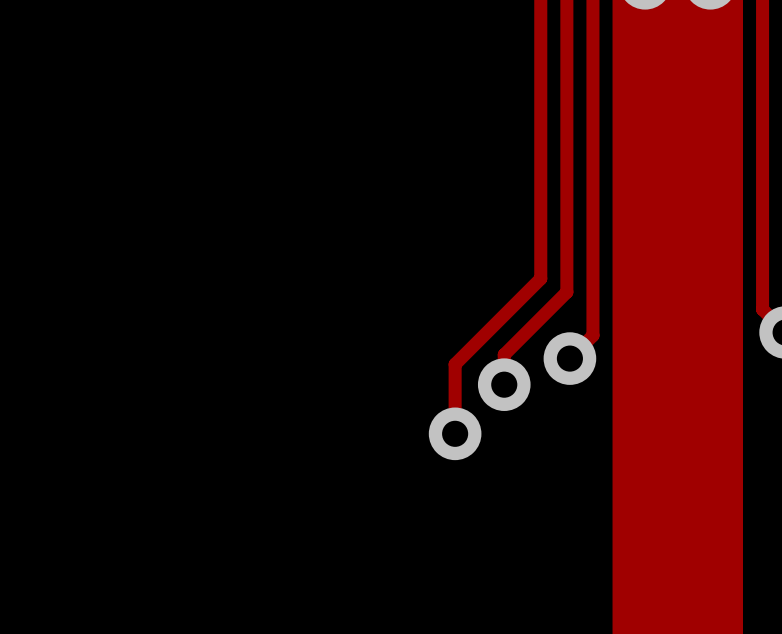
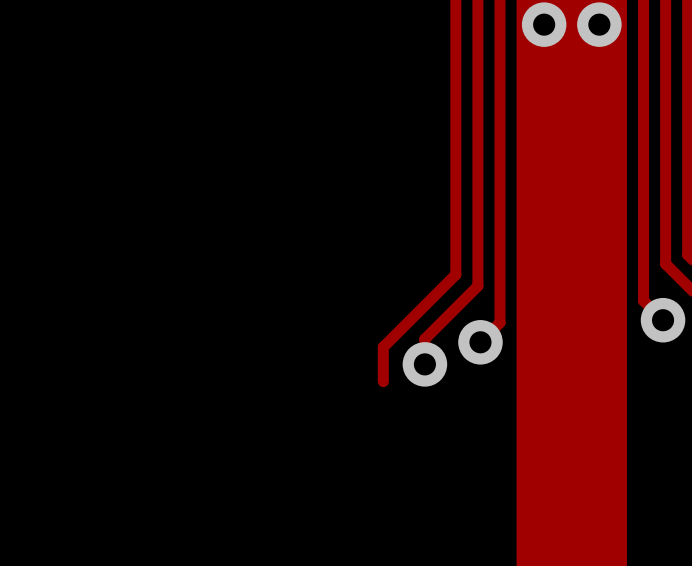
via: (455, 433) -> none

